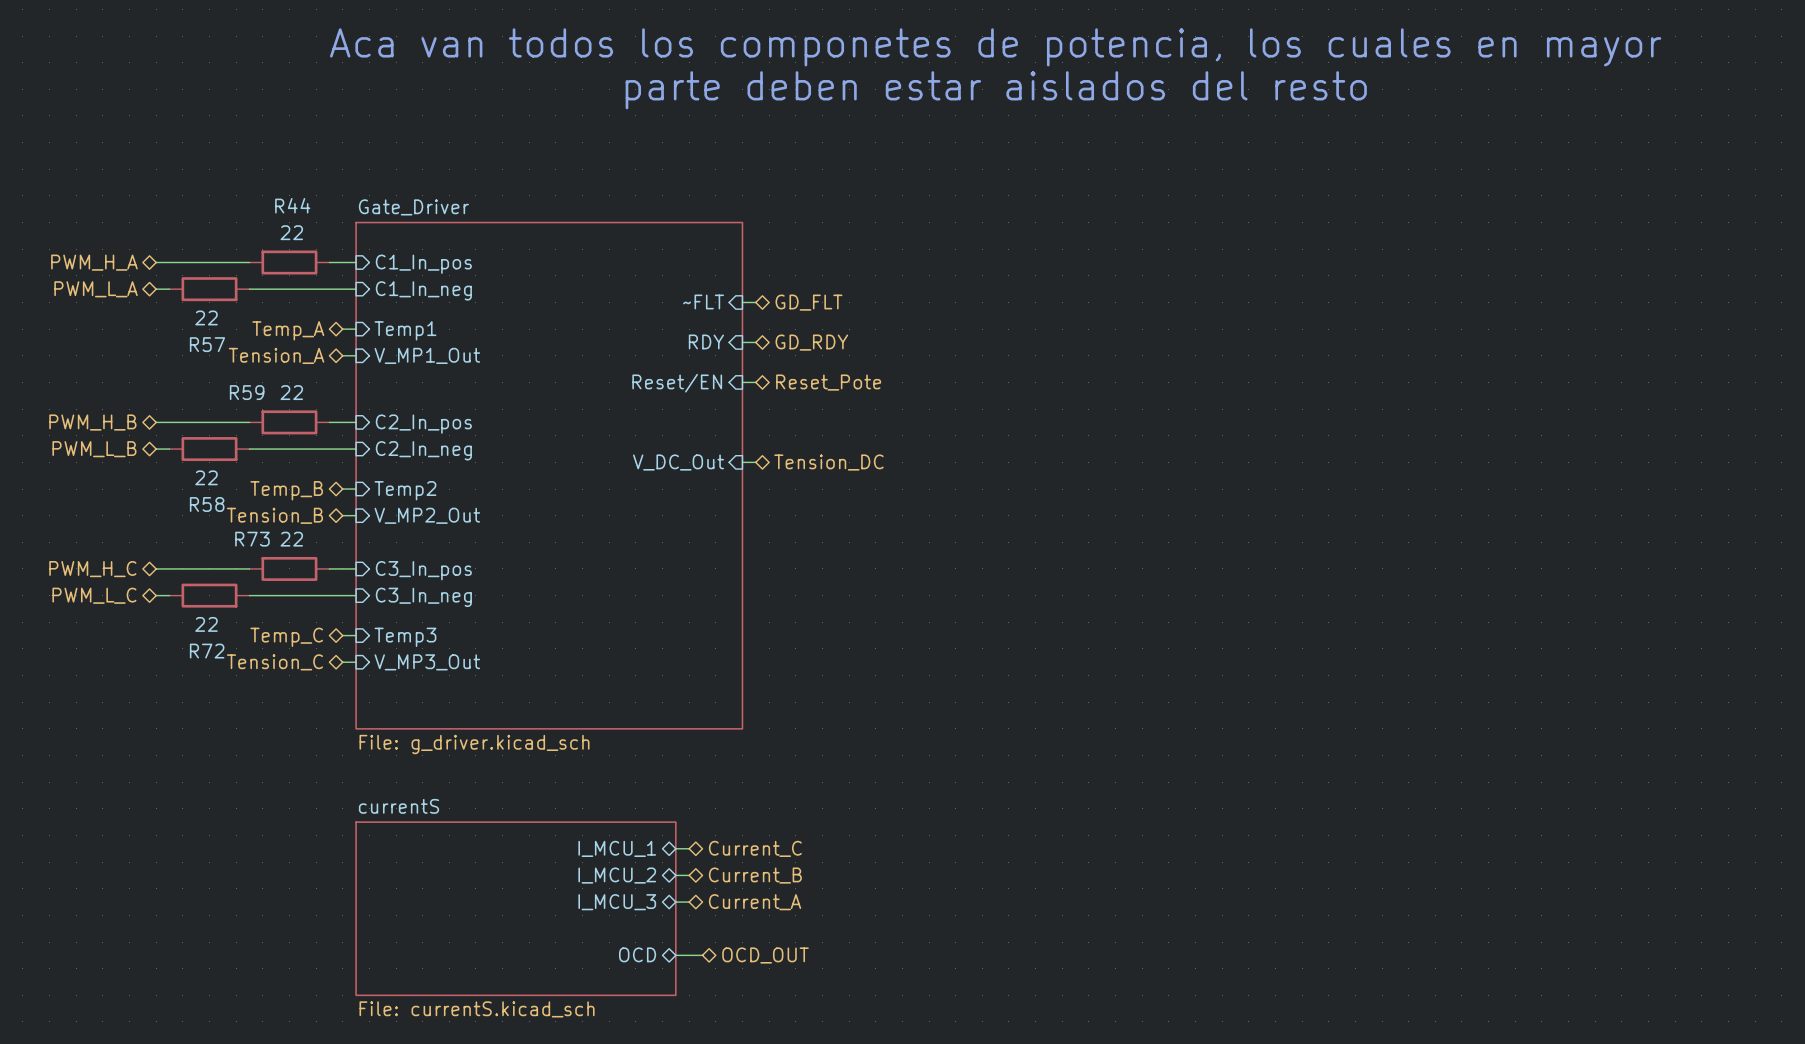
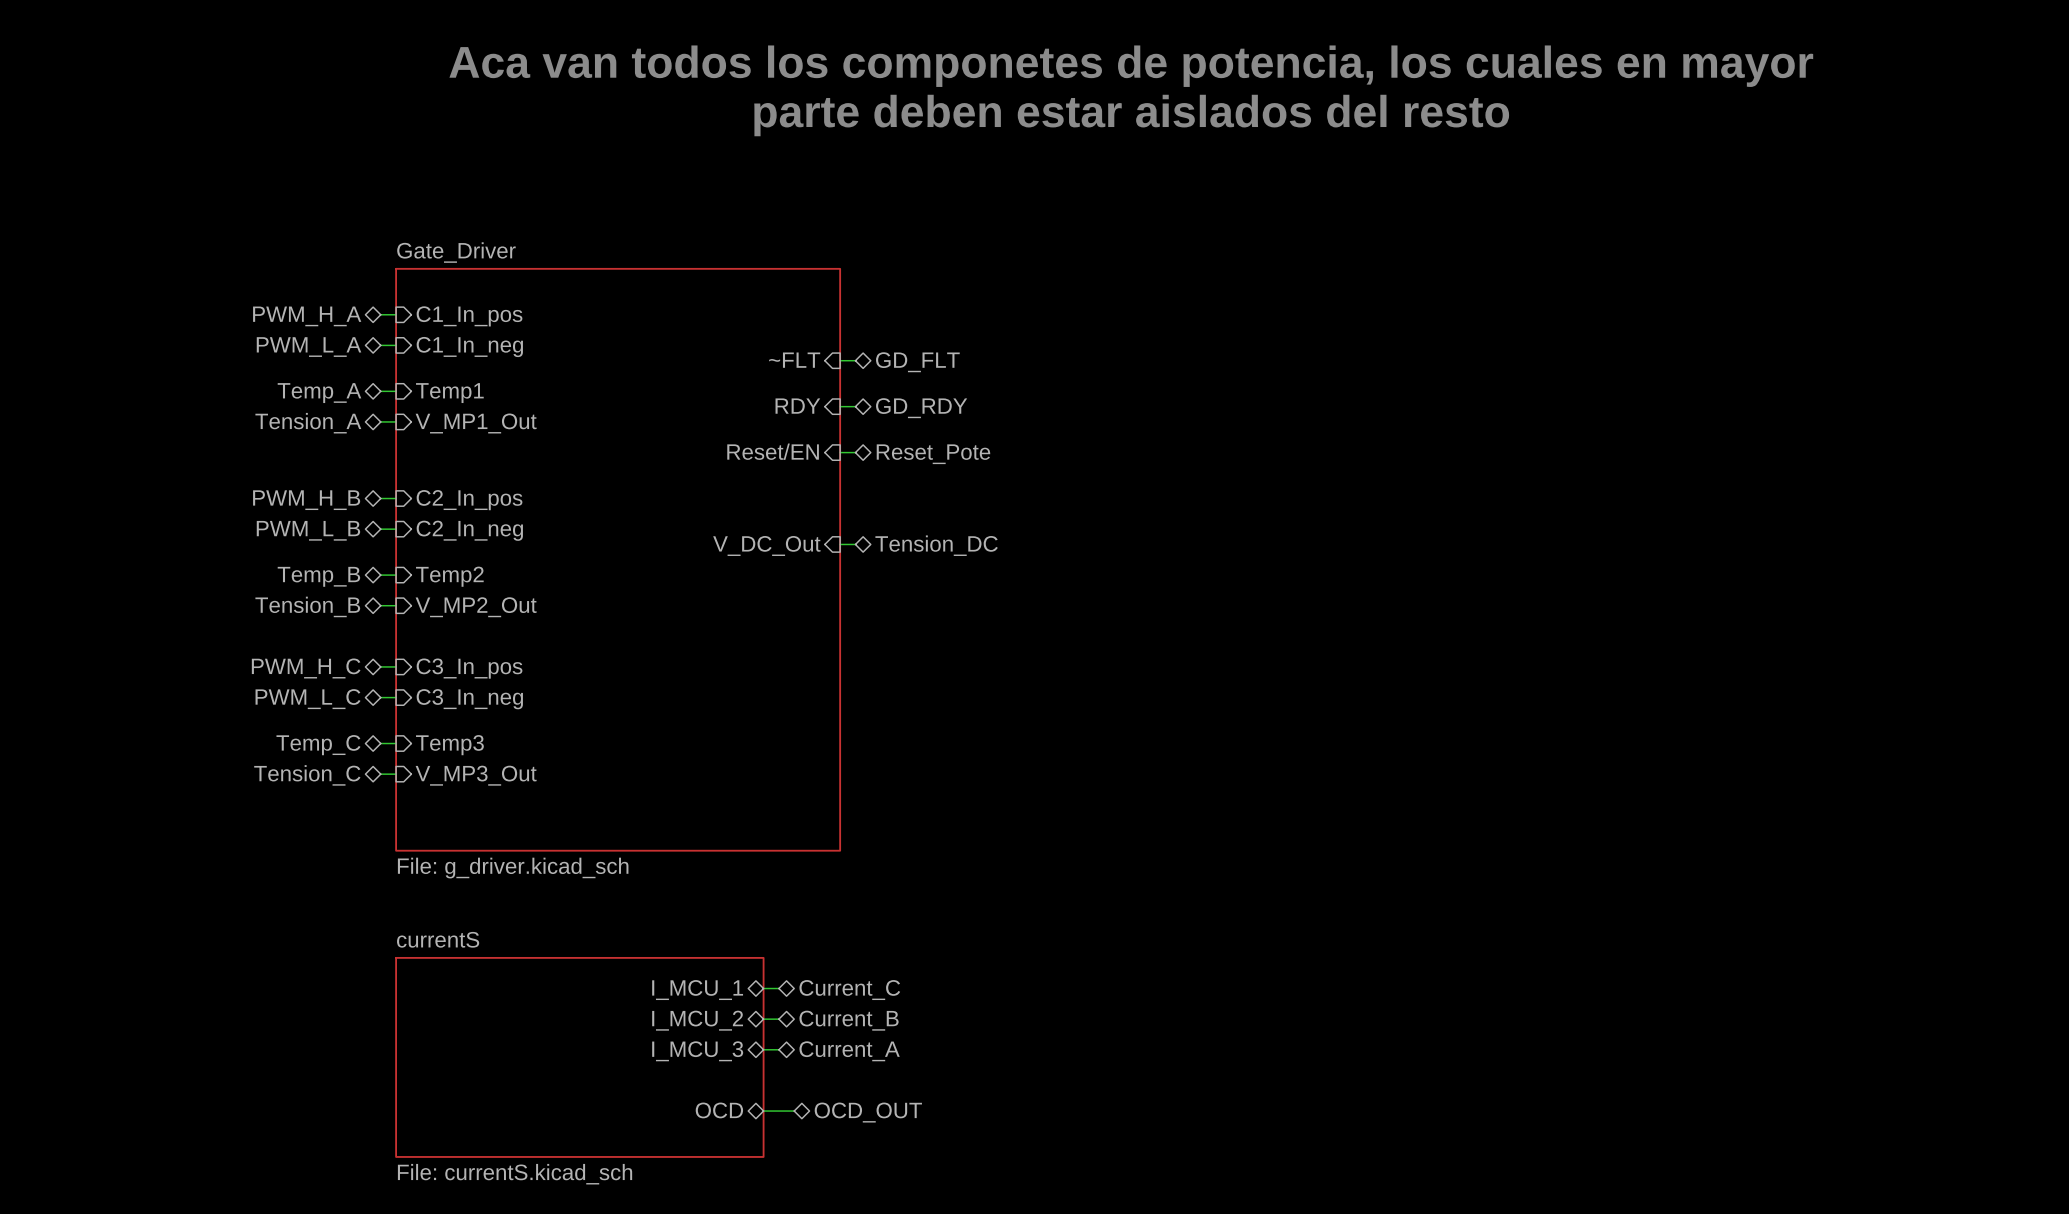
hierarchical label position: PWM_H_A (94, 262) -> PWM_H_A (307, 316)
wire: (156, 262) (249, 262) -> none
R44: 22 (289, 262) -> none
wire: (329, 262) (342, 262) -> none
hierarchical label position: PWM_L_A (96, 289) -> PWM_L_A (309, 347)
wire: (156, 289) (169, 289) -> none
R57: 22 (209, 289) -> none
wire: (249, 289) (342, 289) -> none
hierarchical label position: PWM_H_B (92, 422) -> PWM_H_B (306, 500)
wire: (156, 422) (249, 422) -> none
R59: 22 (289, 422) -> none
wire: (329, 422) (342, 422) -> none
hierarchical label position: PWM_L_B (94, 449) -> PWM_L_B (308, 530)
wire: (156, 449) (169, 449) -> none
R58: 22 (209, 449) -> none
wire: (249, 449) (342, 449) -> none
wire: (156, 568) (249, 568) -> none
R73: 22 (289, 568) -> none
wire: (329, 568) (342, 568) -> none
hierarchical label position: PWM_H_C (92, 569) -> PWM_H_C (306, 668)
hierarchical label position: PWM_L_C (94, 595) -> PWM_L_C (308, 699)
wire: (156, 595) (169, 595) -> none
R72: 22 (209, 595) -> none
wire: (249, 595) (342, 595) -> none

